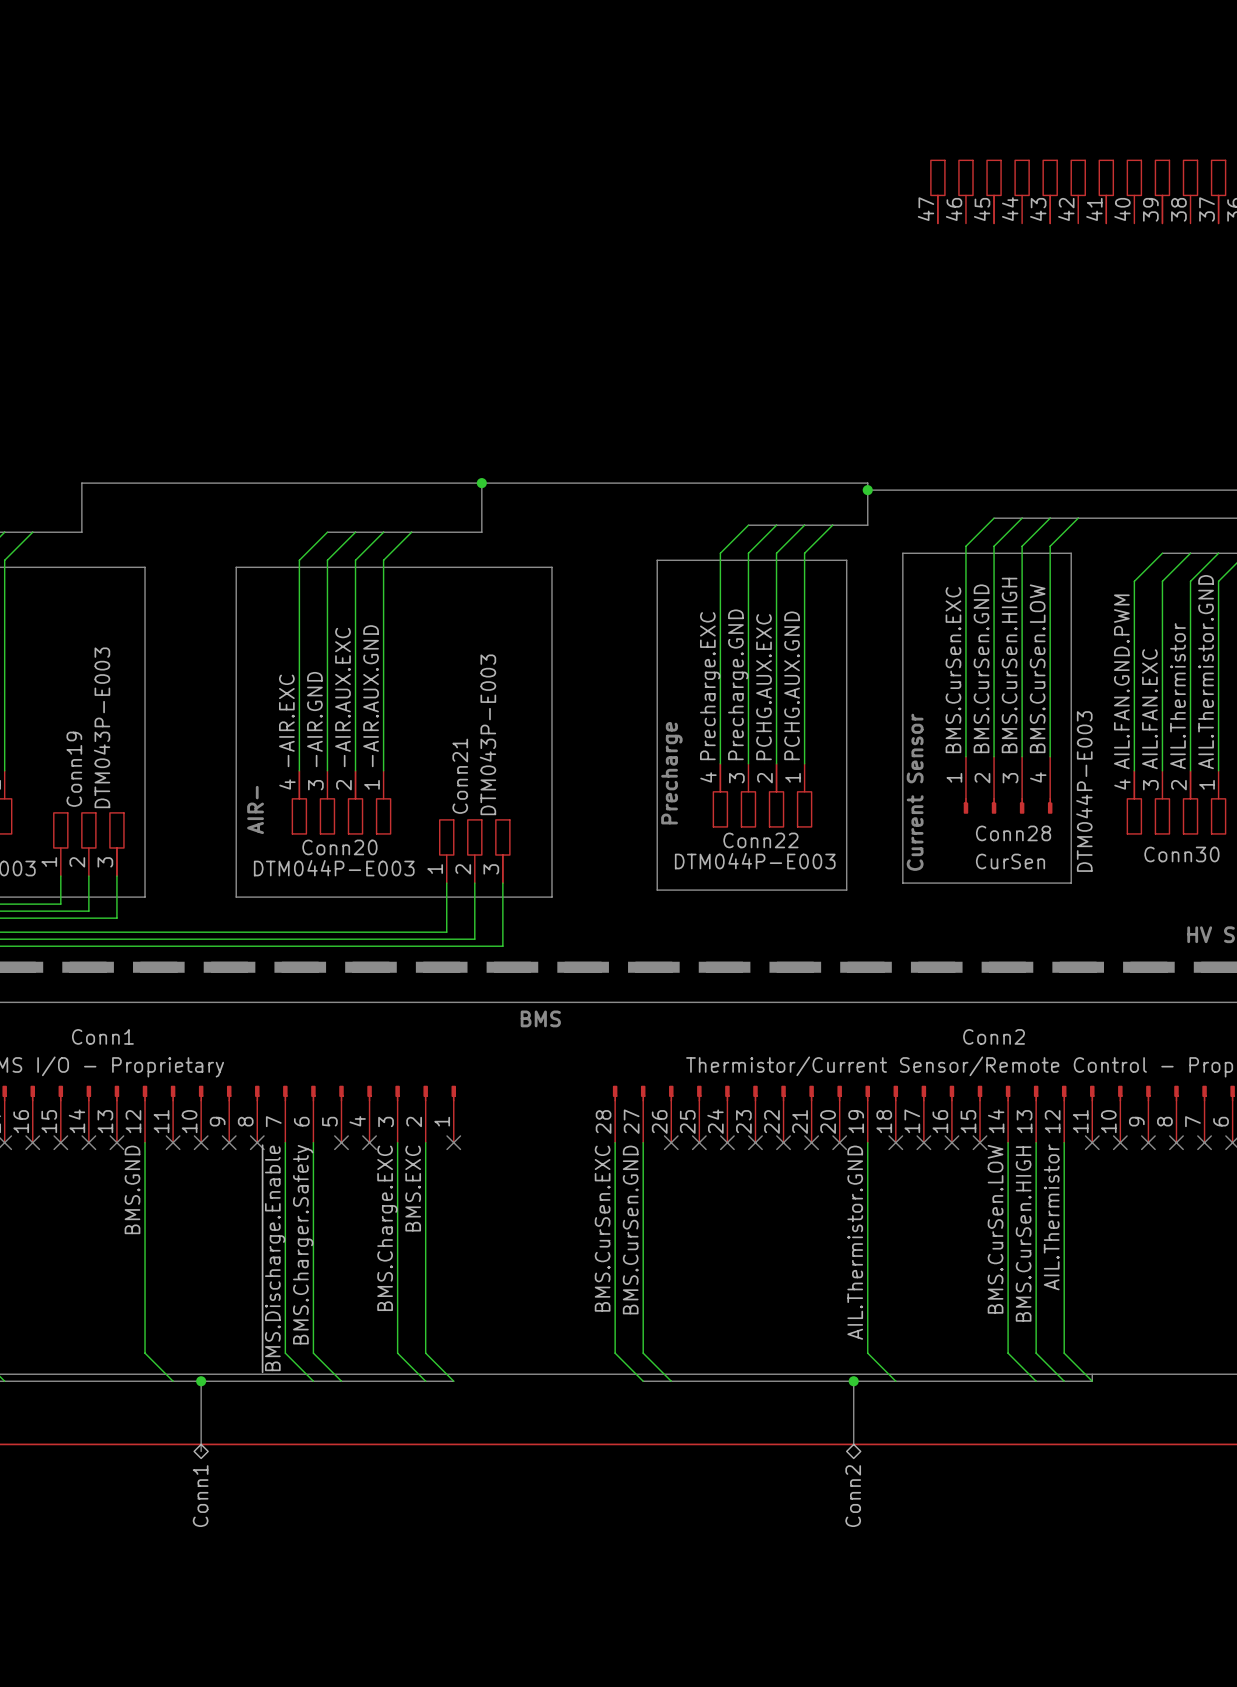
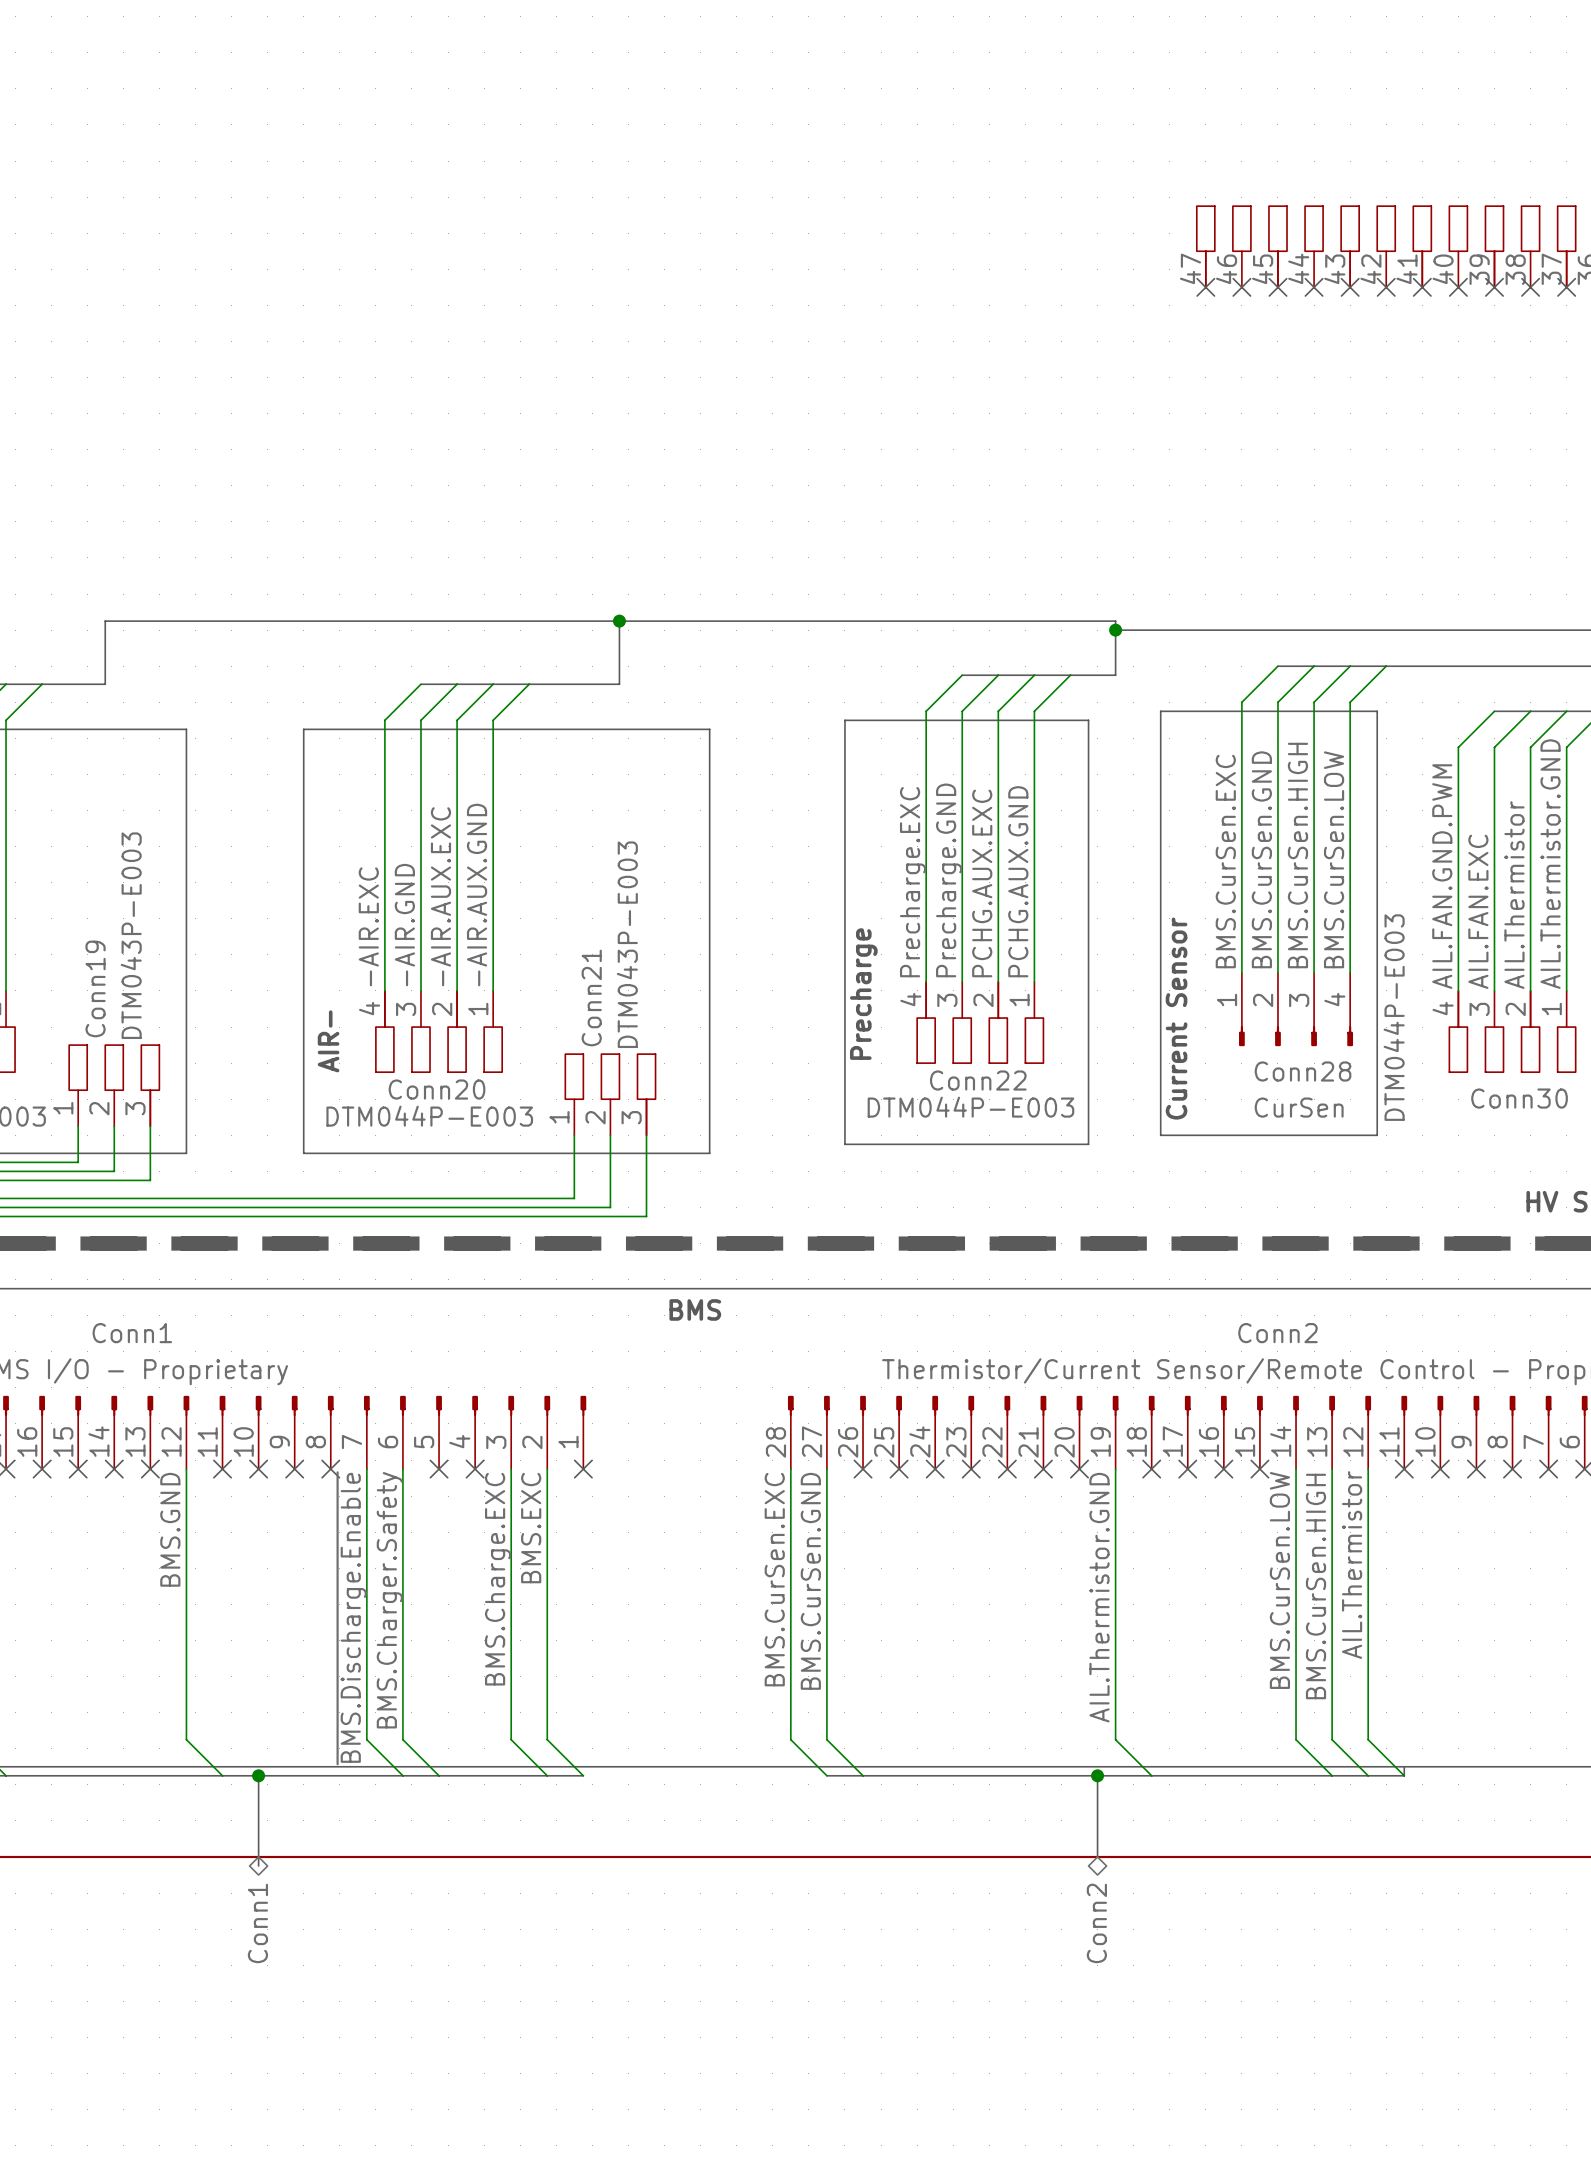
no-connect mark: none -> (1205, 287)
no-connect mark: none -> (1241, 287)
no-connect mark: none -> (1277, 287)
no-connect mark: none -> (1314, 287)
no-connect mark: none -> (1350, 287)
no-connect mark: none -> (1386, 287)
no-connect mark: none -> (1422, 287)
no-connect mark: none -> (1458, 287)
no-connect mark: none -> (1494, 287)
no-connect mark: none -> (1530, 287)
no-connect mark: none -> (1566, 287)

